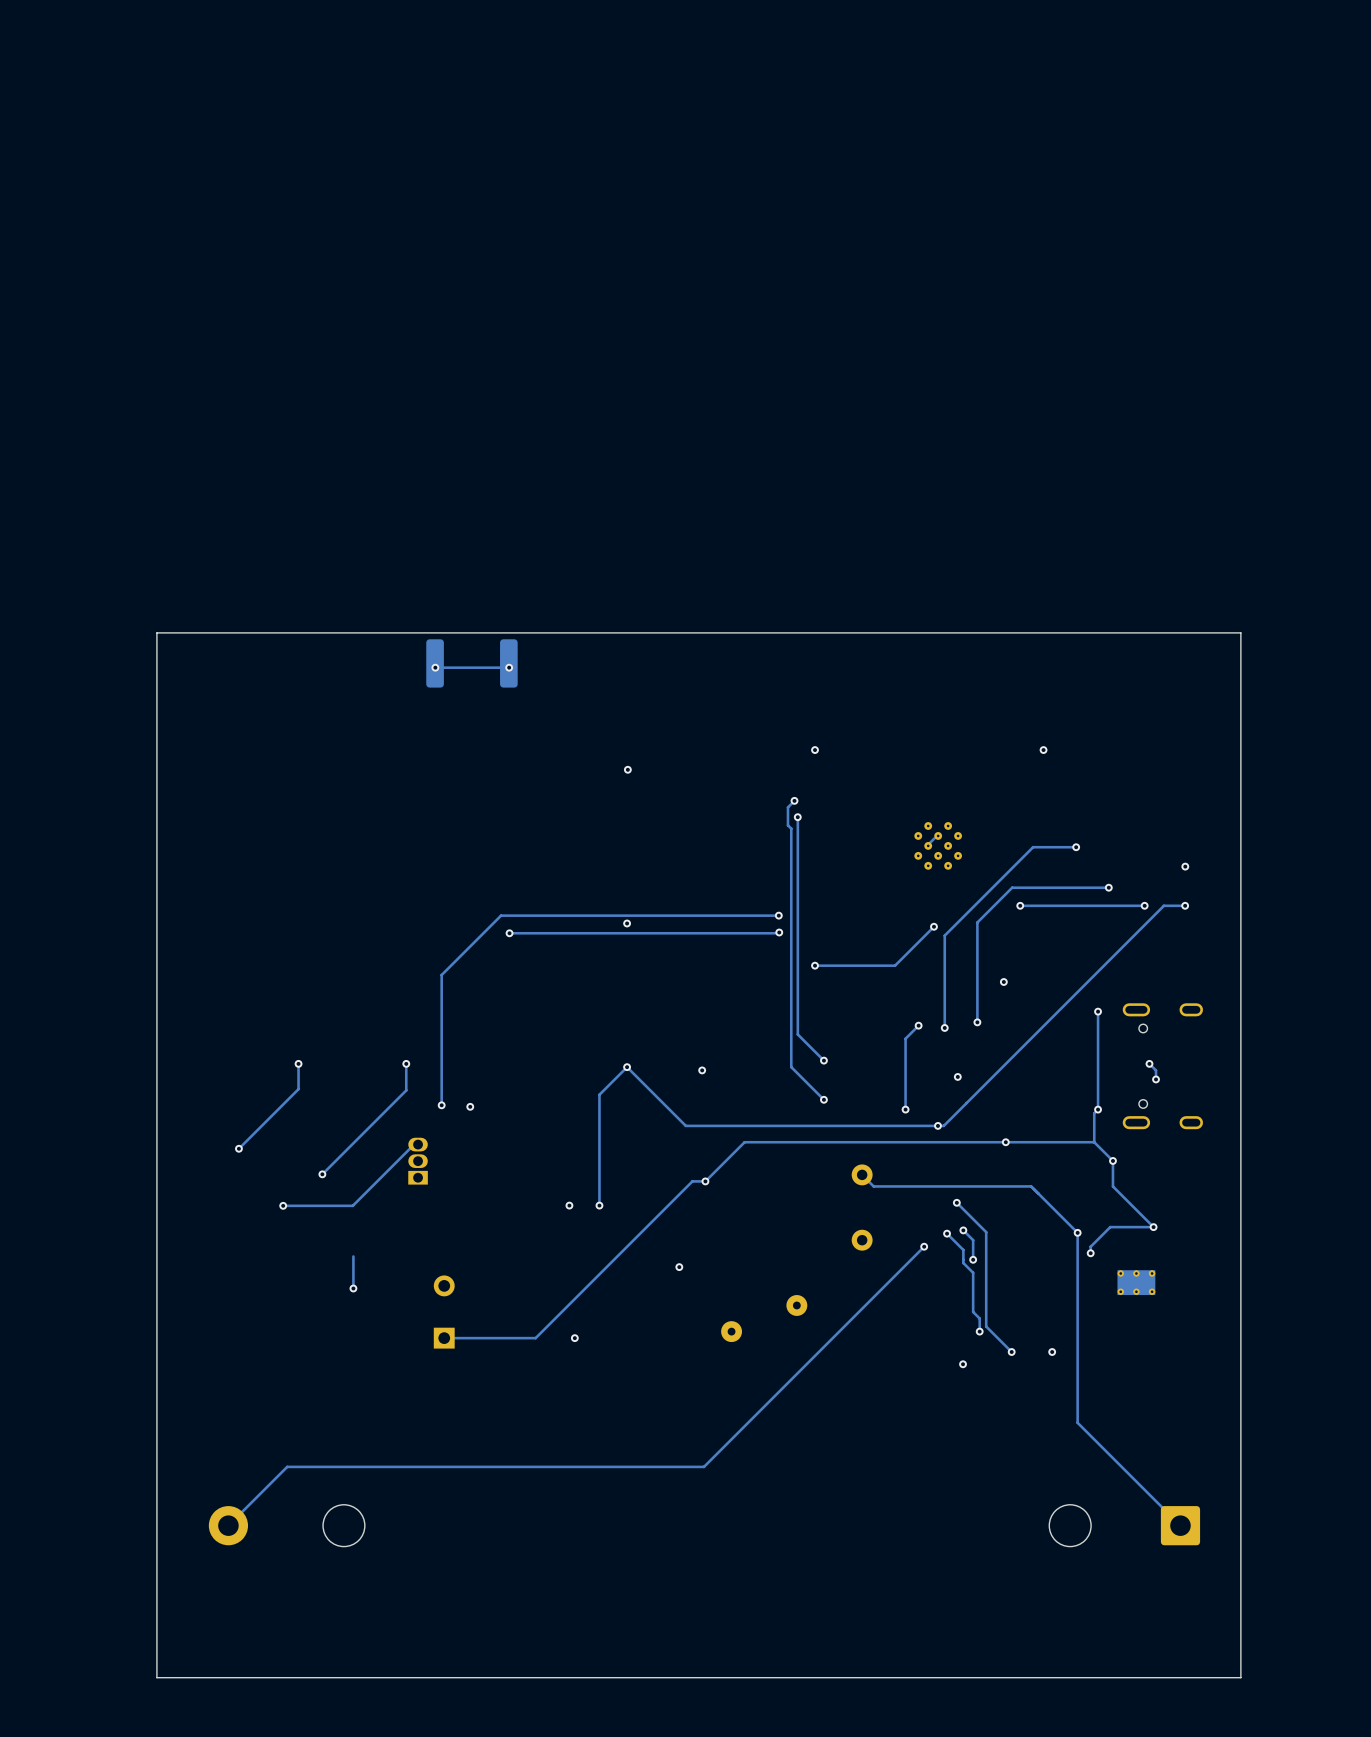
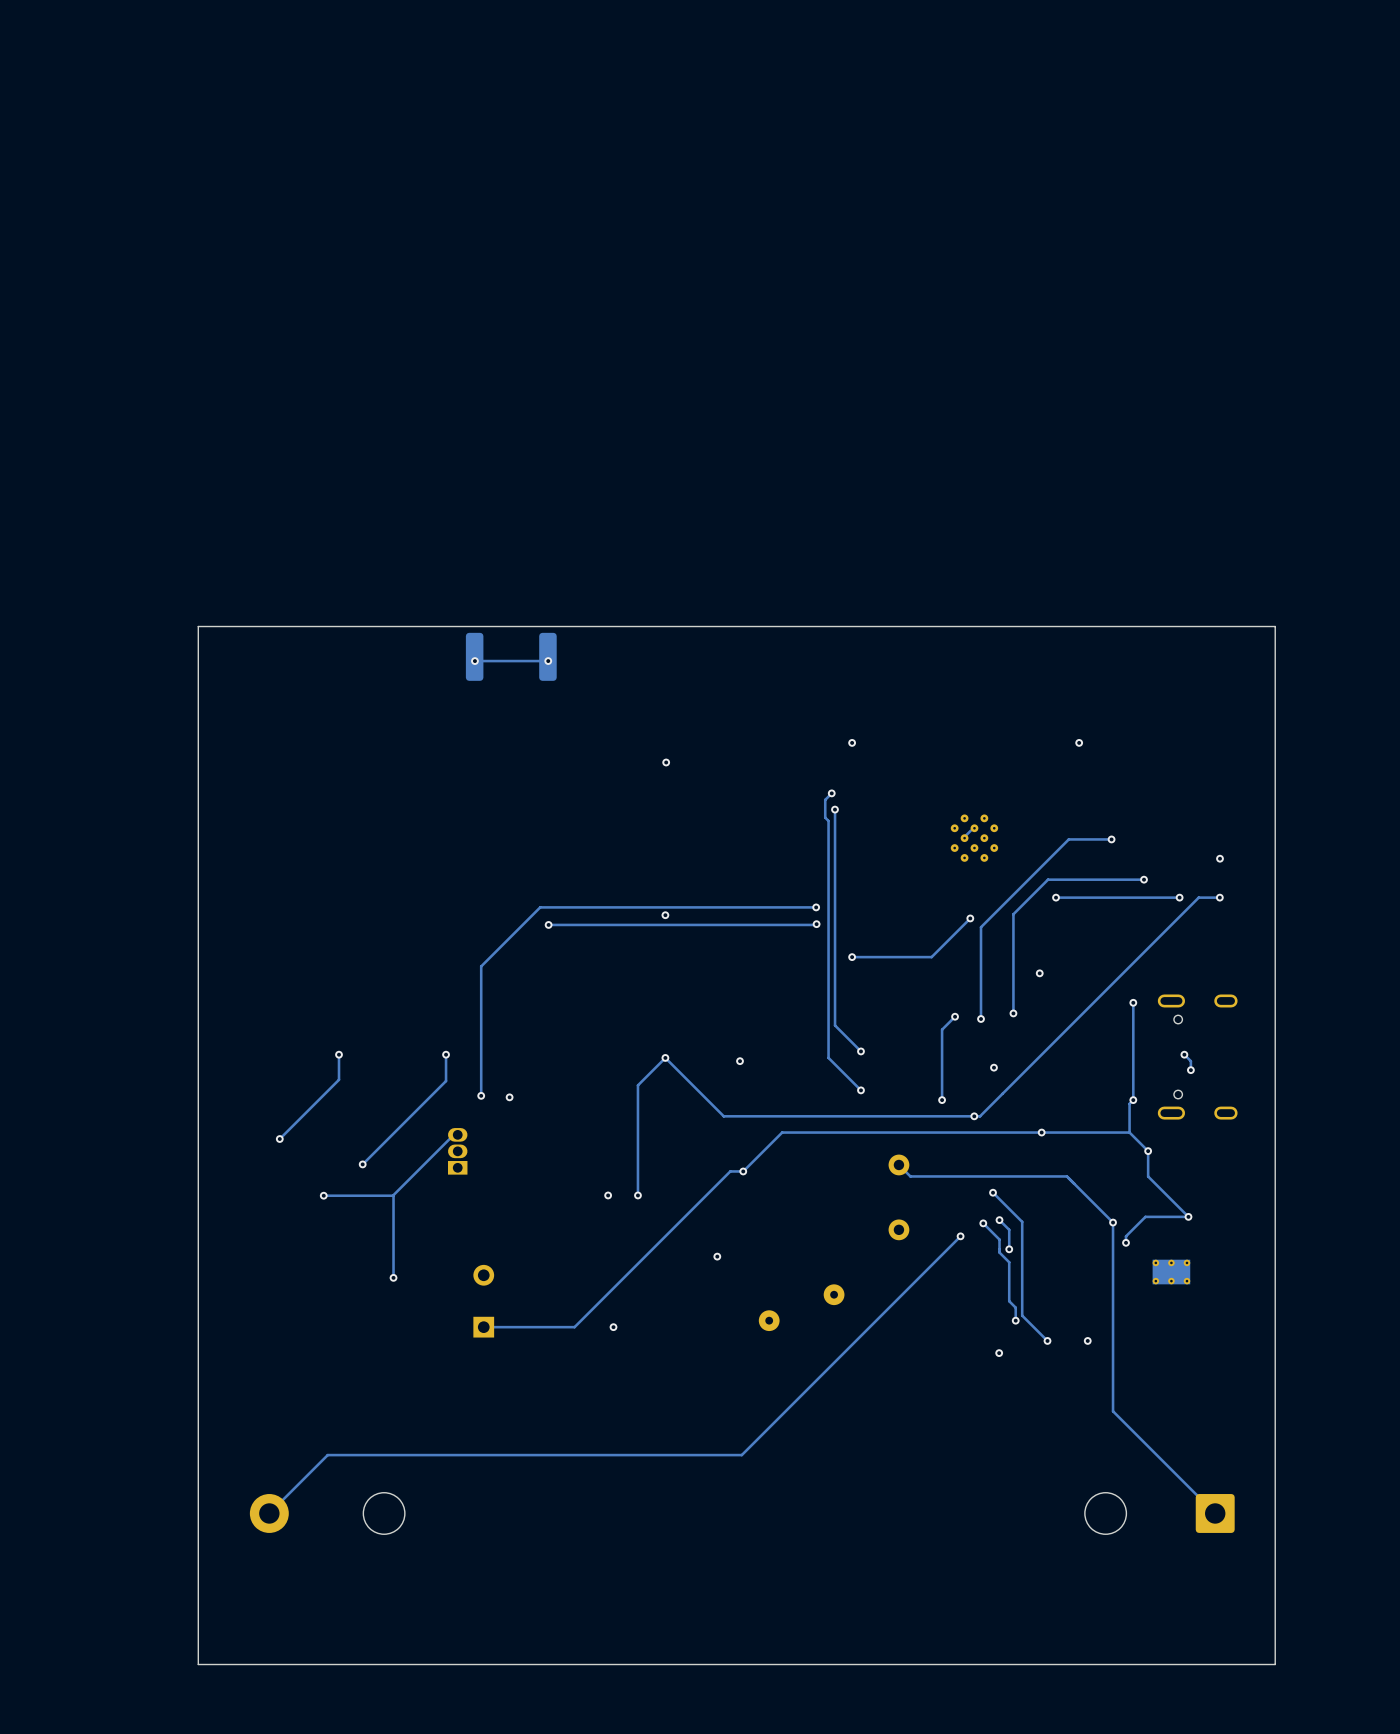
track: none -> (393, 1196) (393, 1246)

